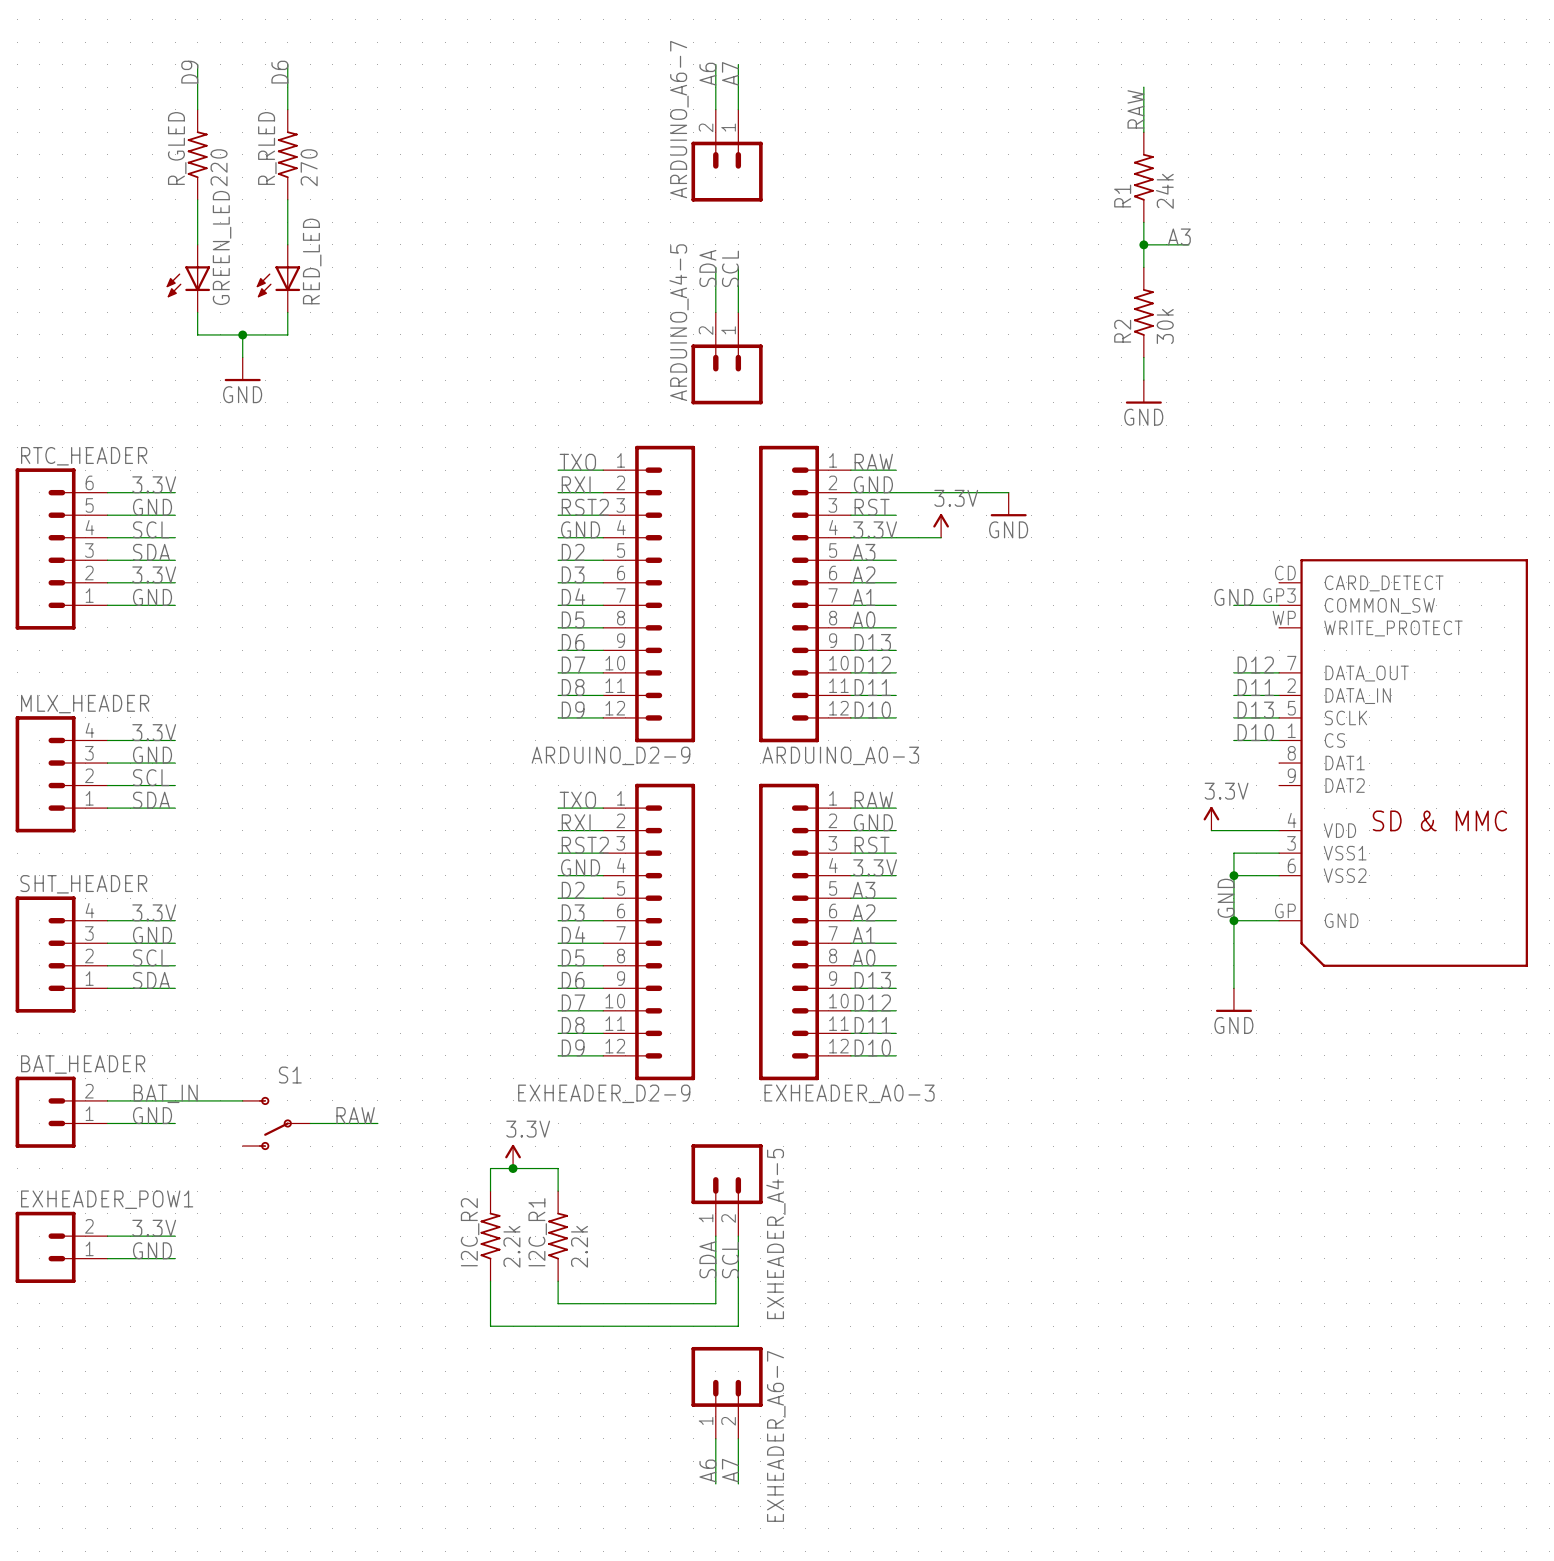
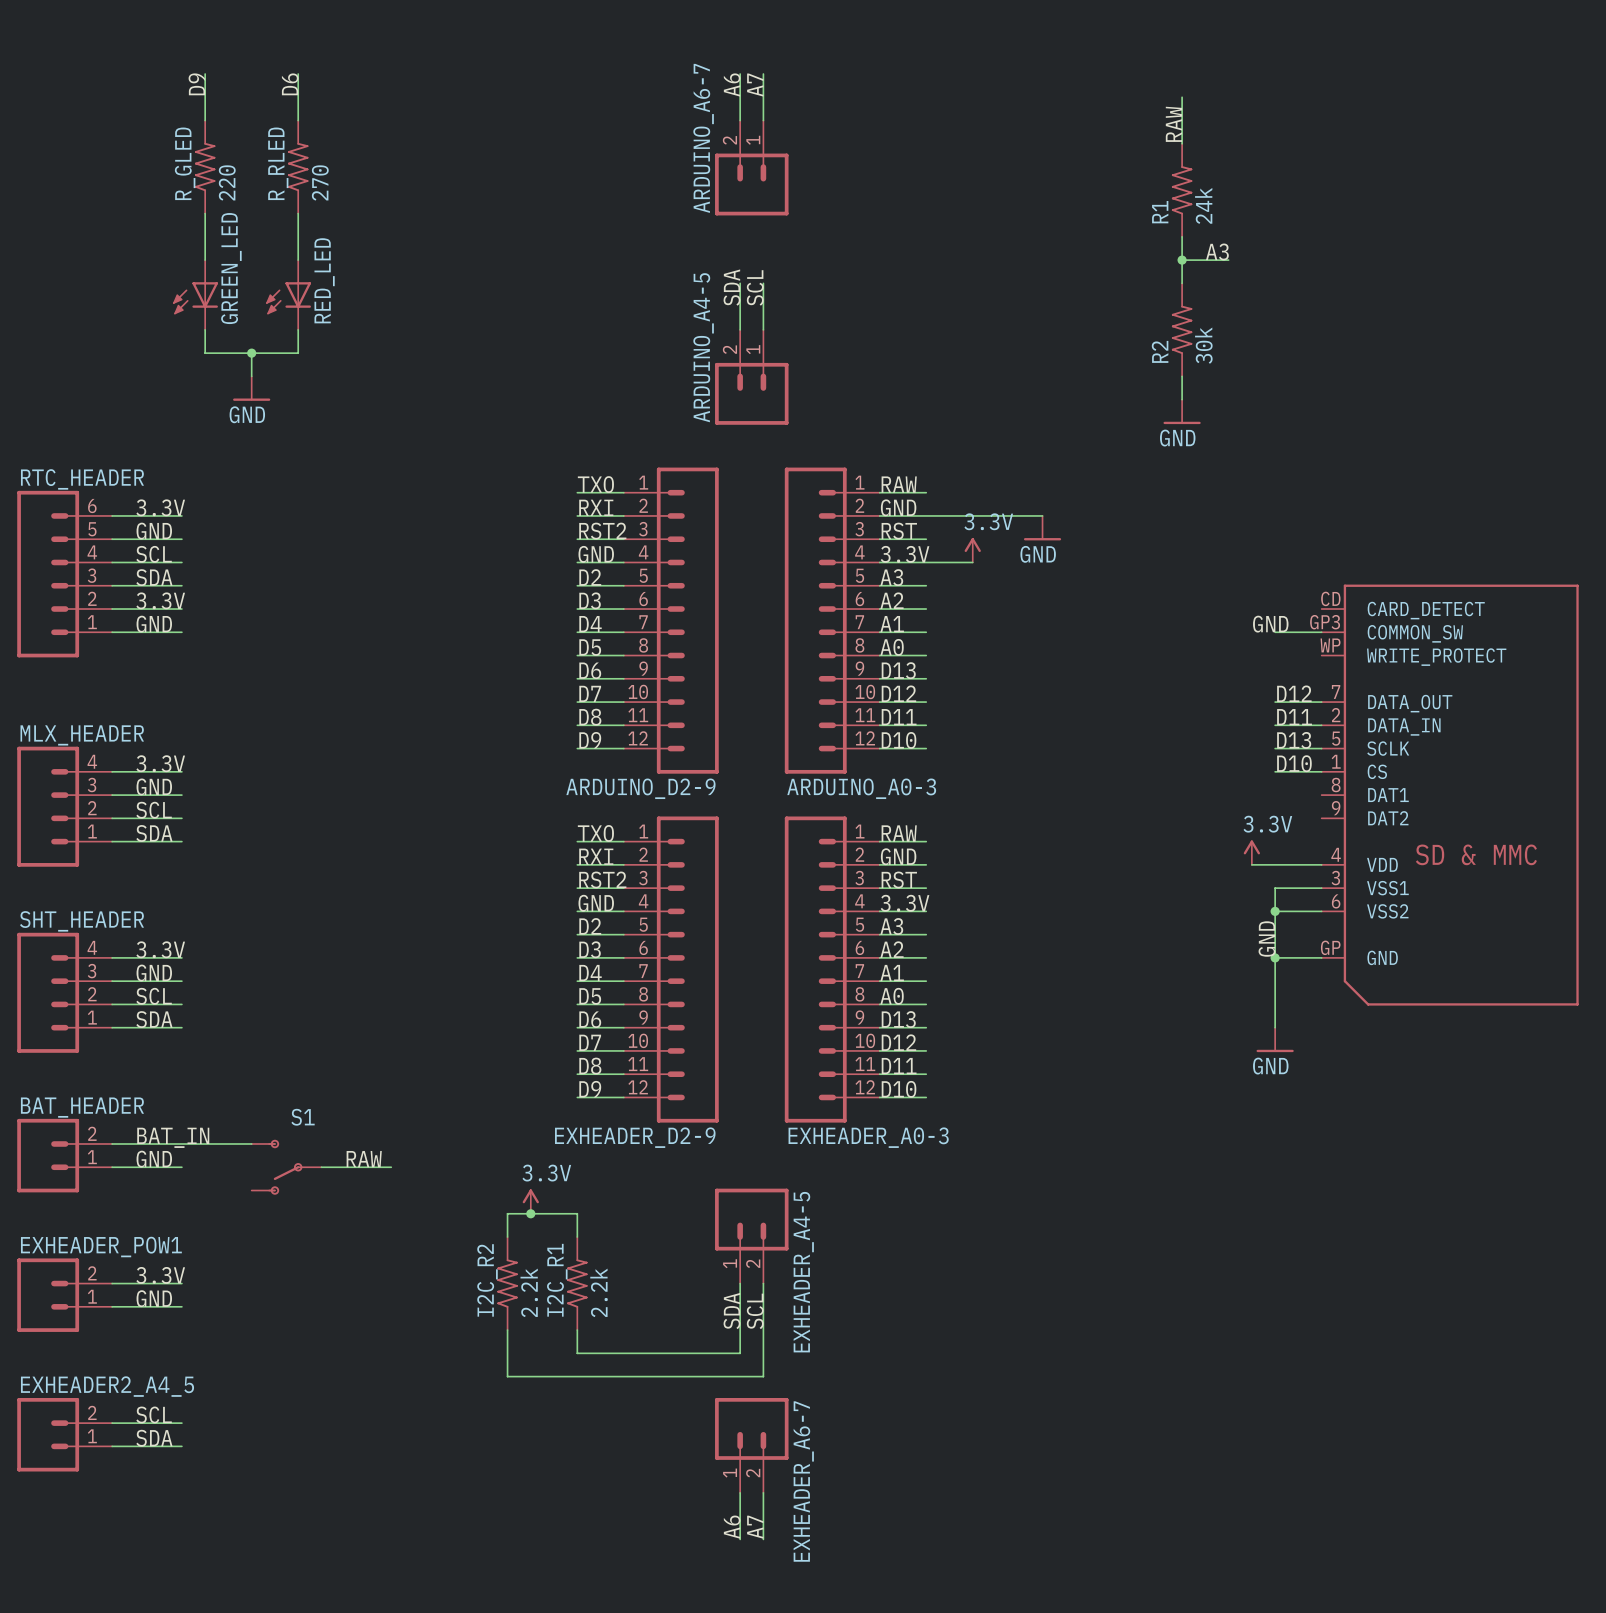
label: none -> SCL (154, 1414)
wire: none -> (112, 1423) (181, 1423)
EXHEADER2_A4_5: none -> (64, 1434)
label: none -> SDA (154, 1438)
wire: none -> (112, 1446) (181, 1446)

